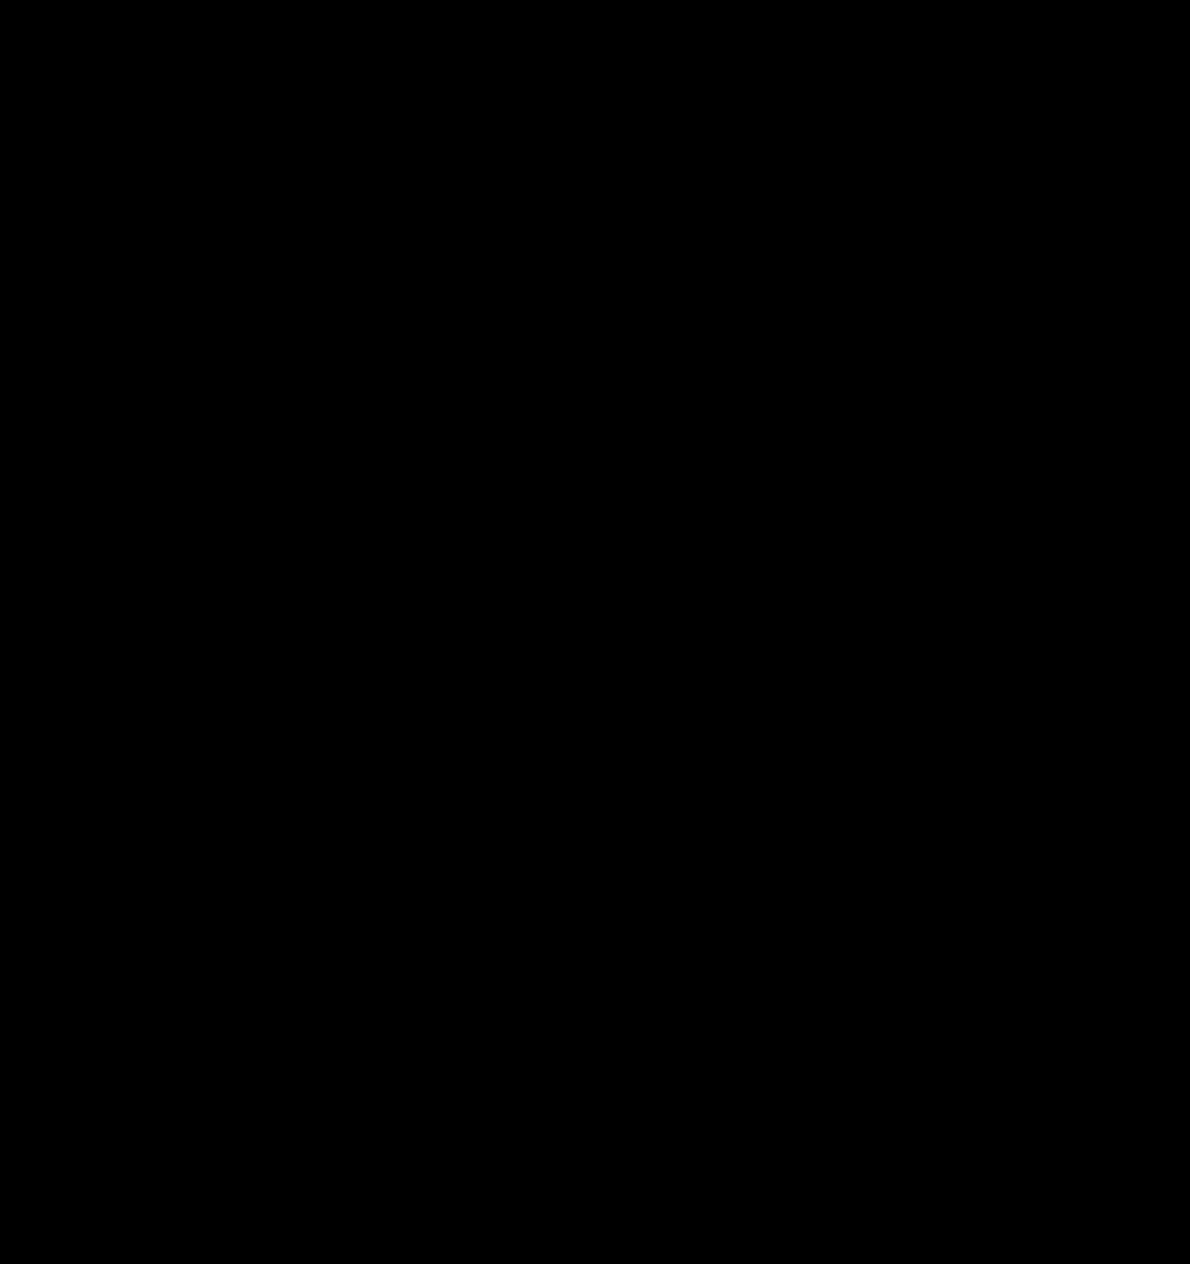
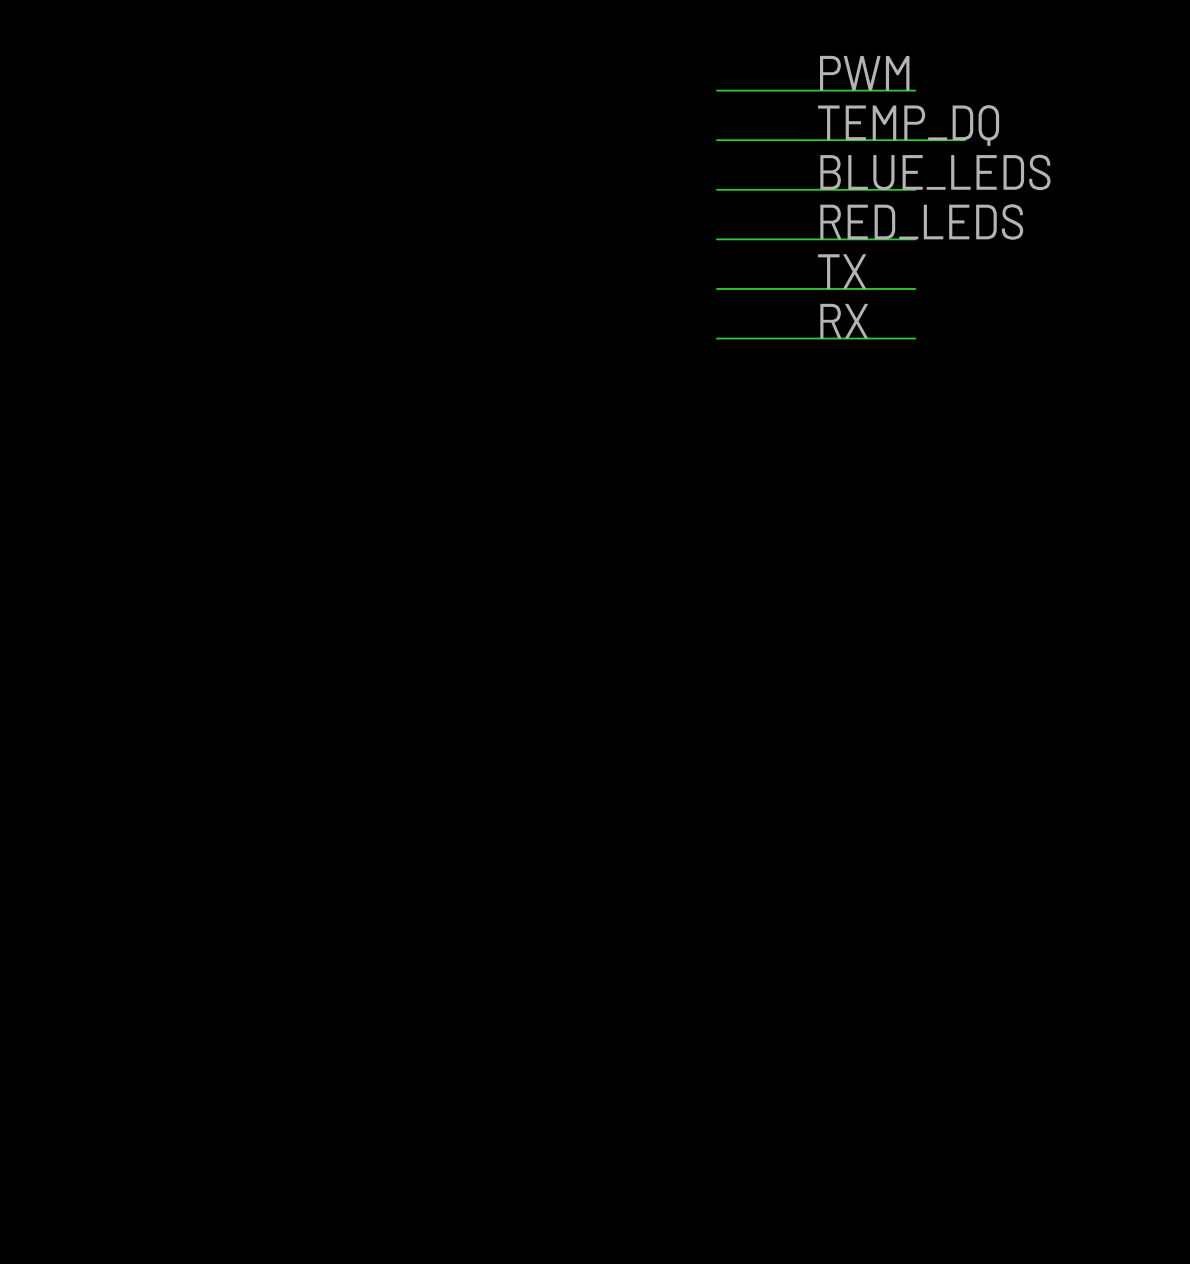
label: none -> PWM (864, 73)
wire: none -> (716, 90) (915, 90)
label: none -> TEMP_DQ (908, 125)
wire: none -> (716, 140) (964, 140)
label: none -> BLUE_LEDS (935, 172)
wire: none -> (716, 189) (915, 189)
label: none -> RED_LEDS (921, 222)
wire: none -> (716, 239) (915, 239)
label: none -> TX (842, 271)
wire: none -> (716, 288) (915, 288)
label: none -> RX (844, 321)
wire: none -> (716, 338) (915, 338)

